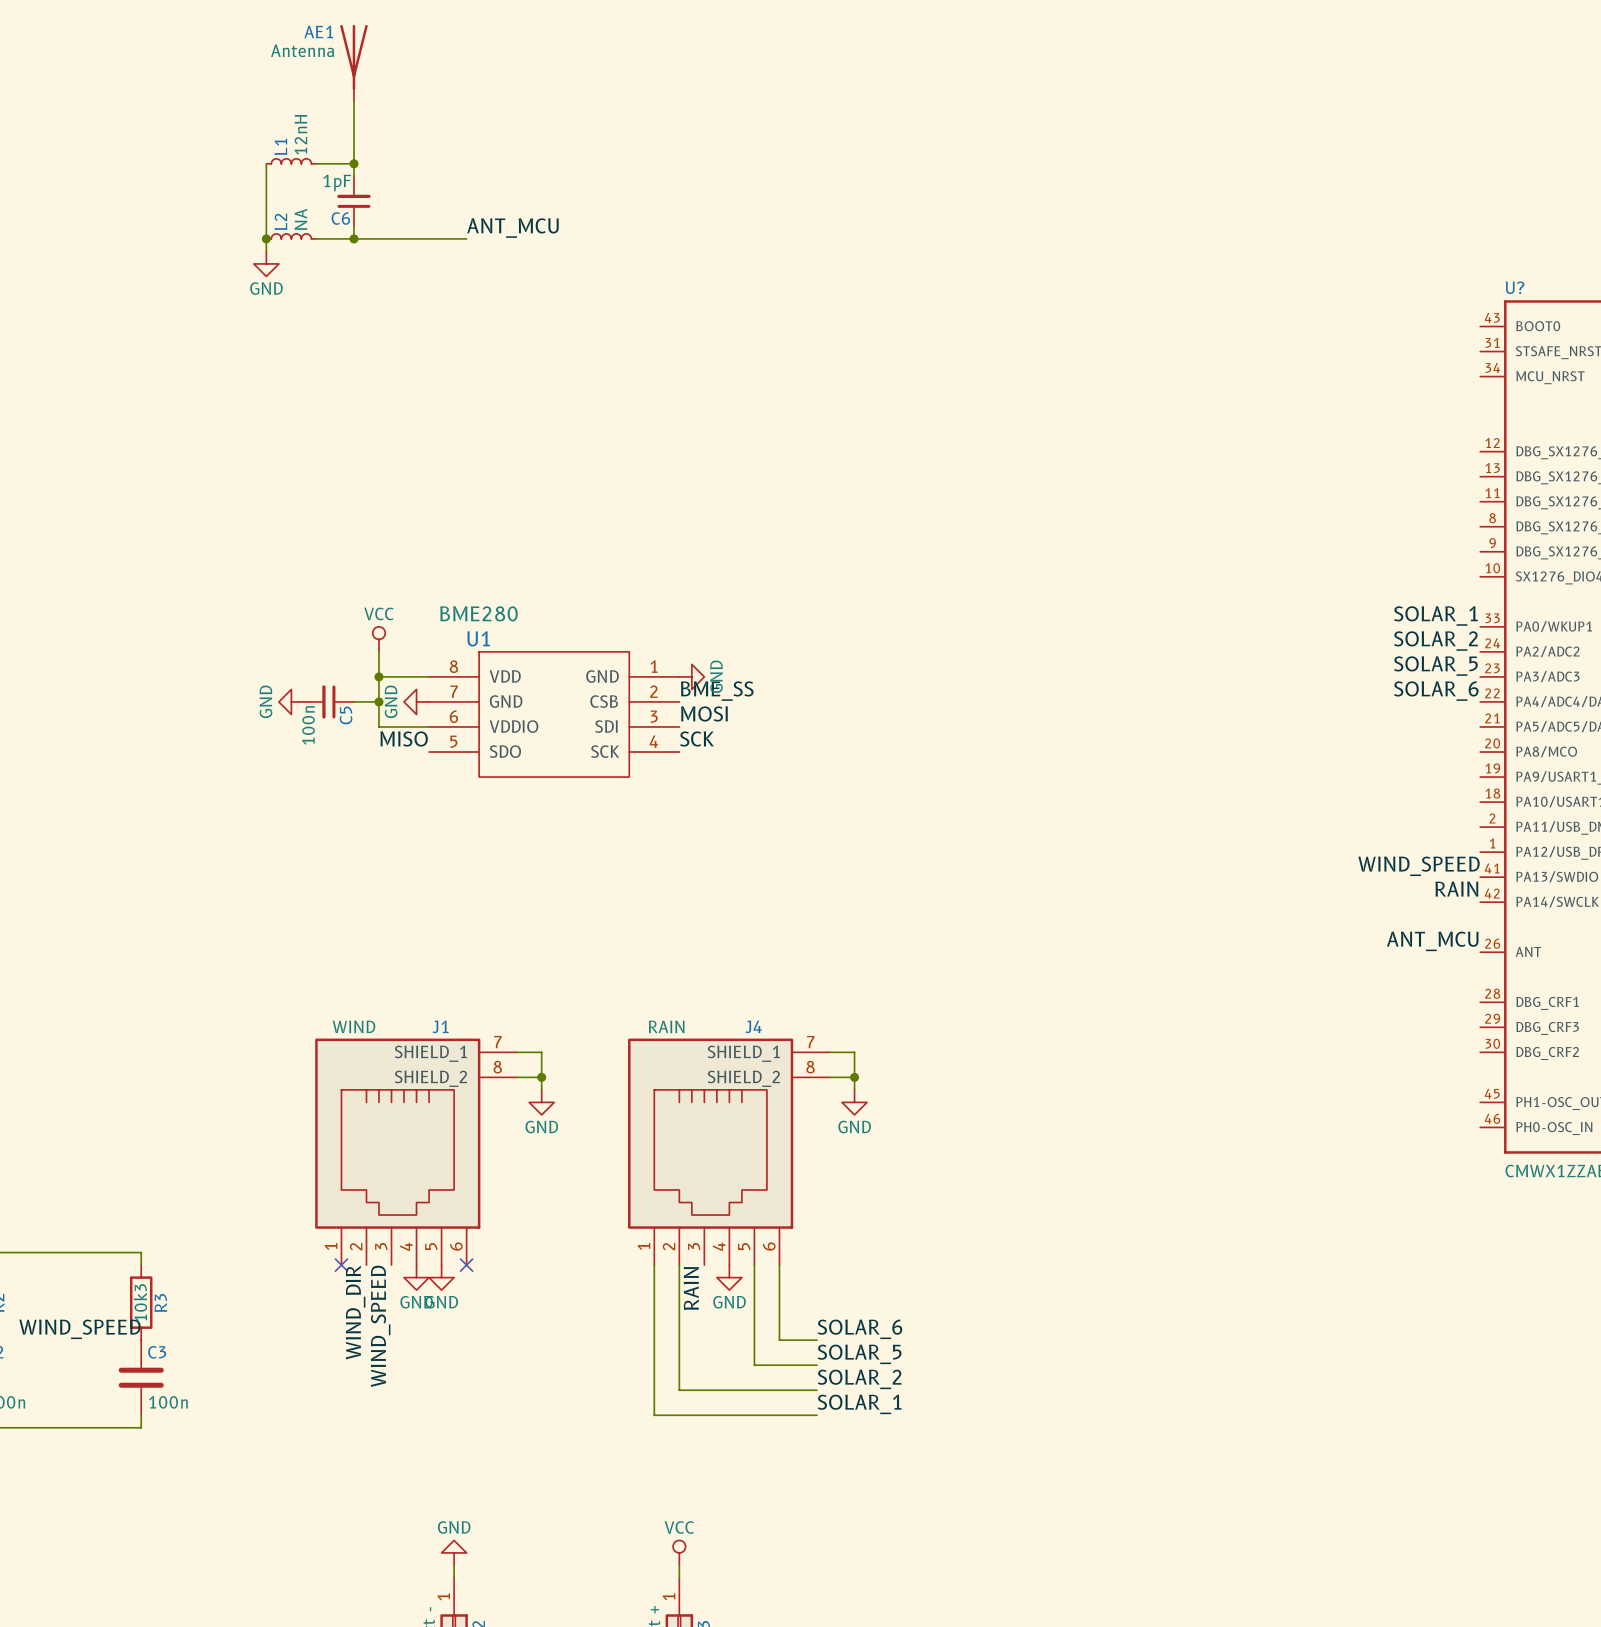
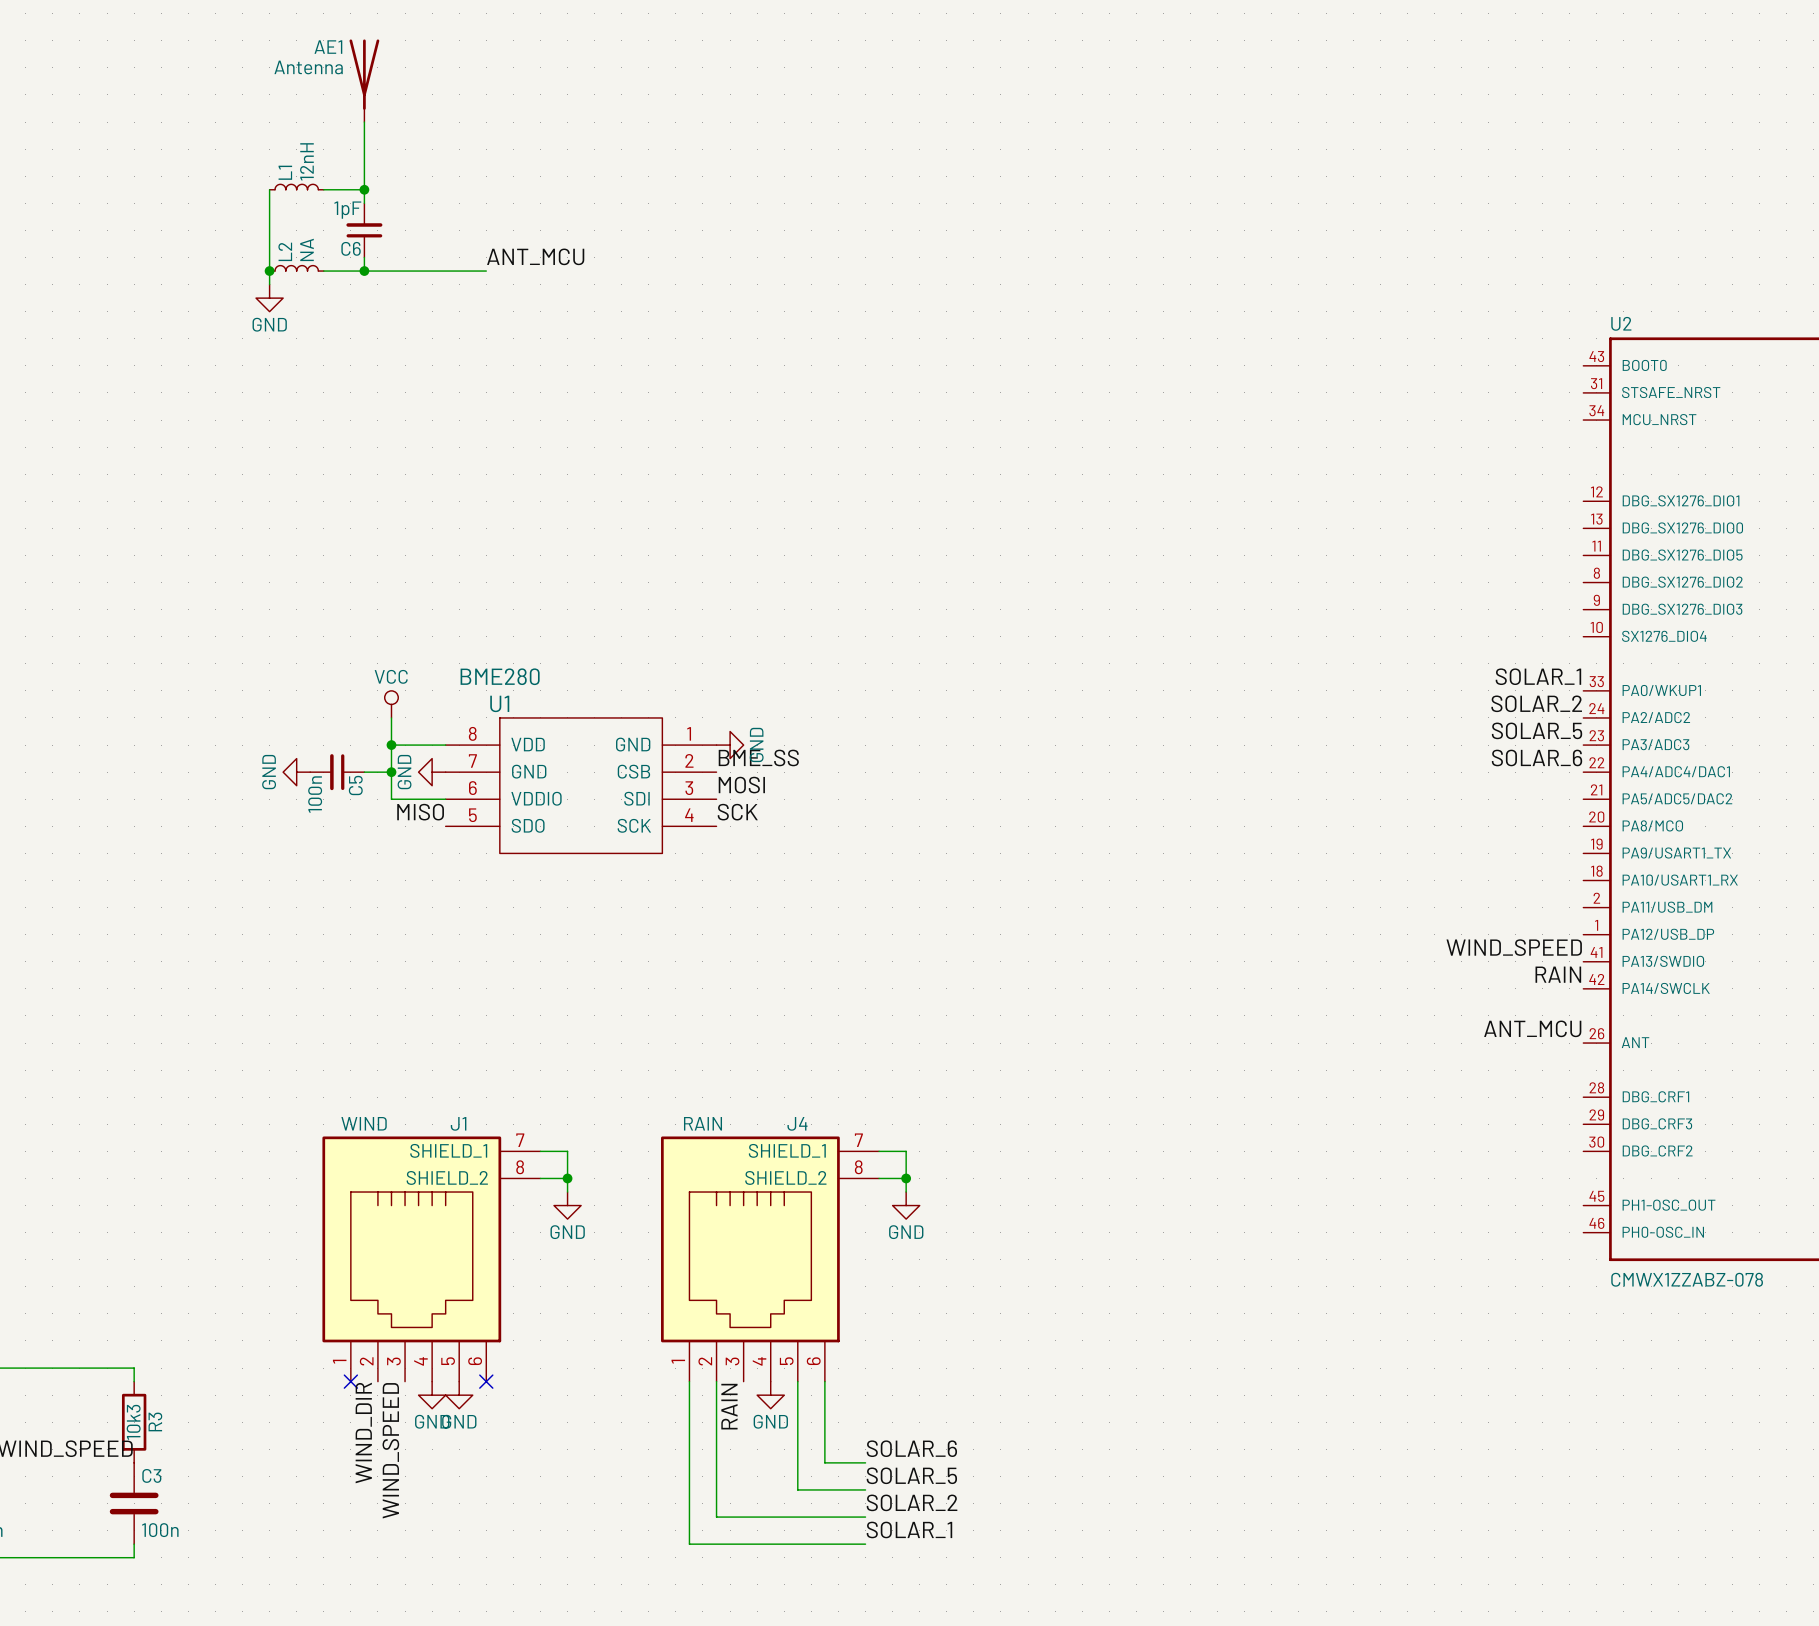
U? name: U? (1515, 287) -> U2 (1621, 323)

